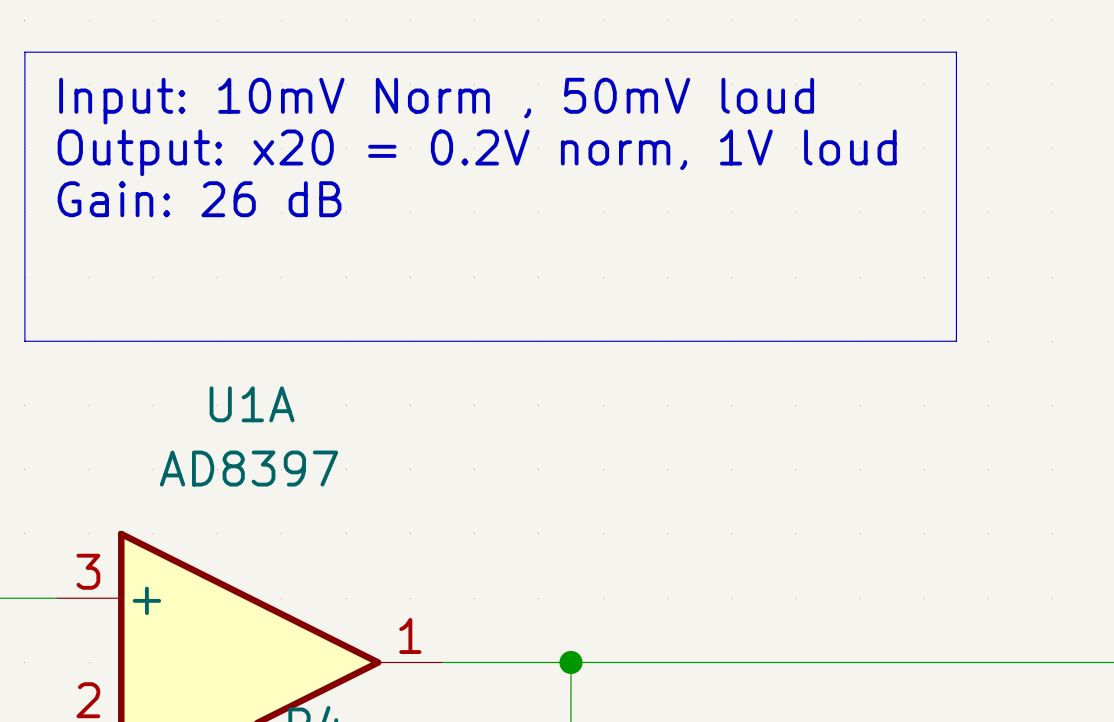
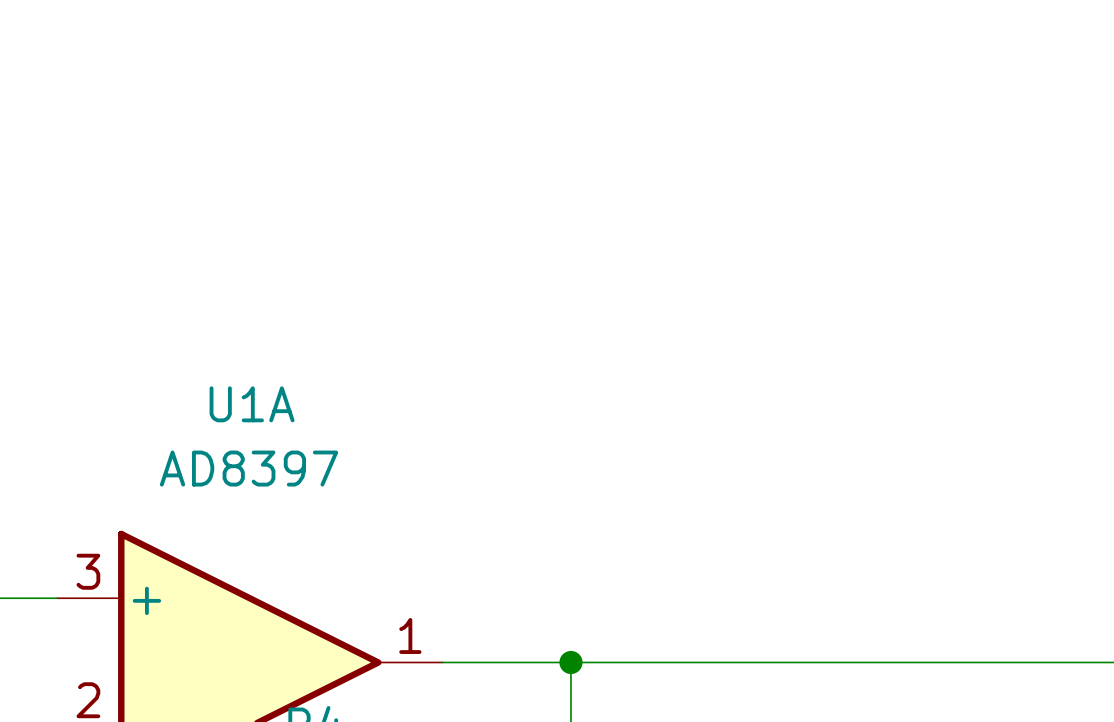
line: (24, 52) (956, 52) (956, 341) (24, 341) (24, 52) -> none
text: Input: 10mV Norm , 50mV loud (436, 101) -> none
text: Output: x20 = 0.2V norm, 1V loud (477, 152) -> none
text: Gain: 26 dB (199, 199) -> none

